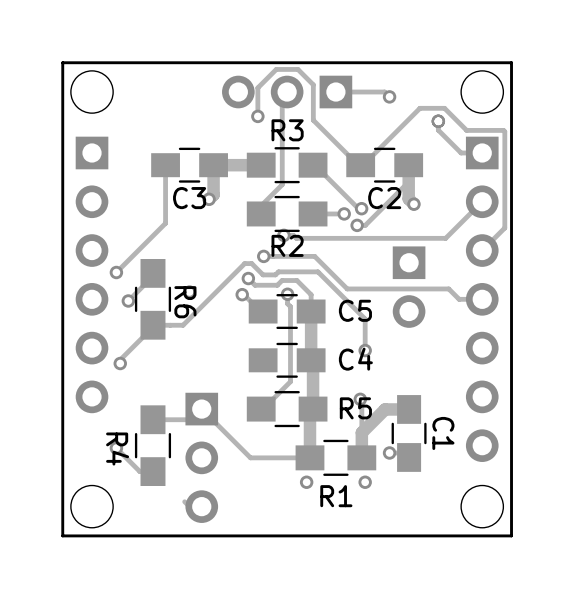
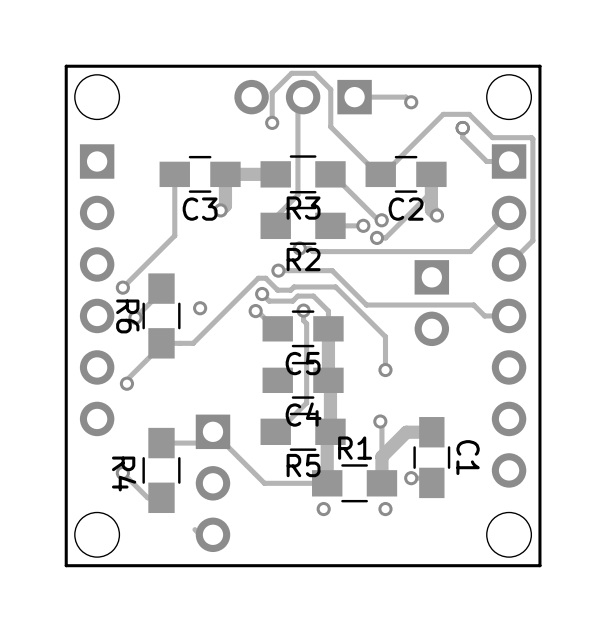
R3 name position: R3 (287, 130) -> R3 (303, 208)
R6 name position: R6 (185, 302) -> R6 (127, 316)
C5 name position: C5 (355, 310) -> C5 (303, 363)
C4 name position: C4 (355, 359) -> C4 (303, 414)
R5 name position: R5 (355, 408) -> R5 (303, 465)
R1 name position: R1 (336, 496) -> R1 (355, 448)

